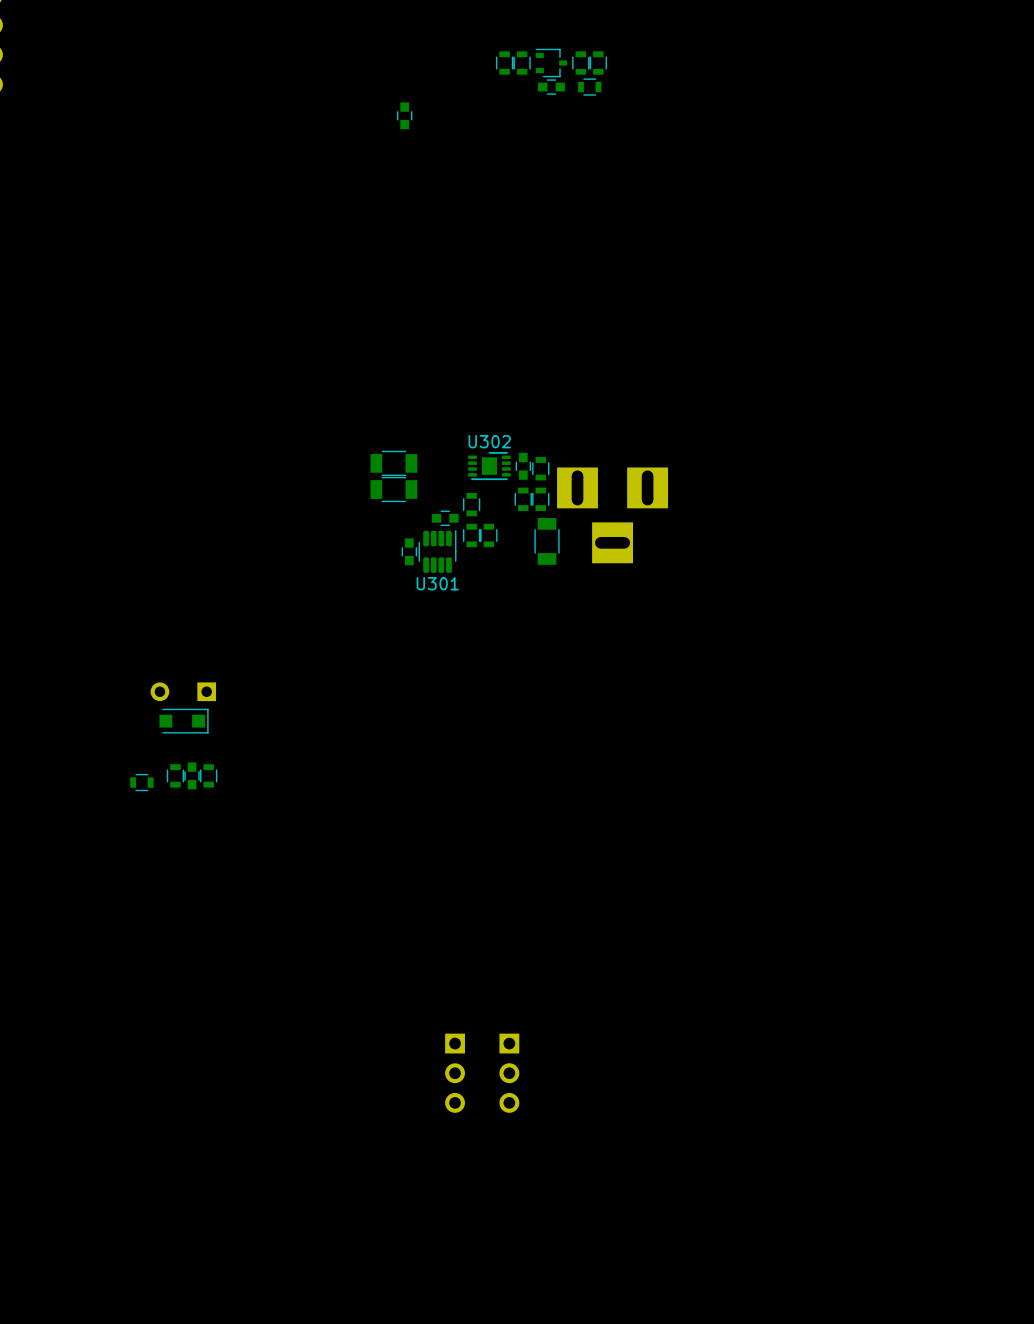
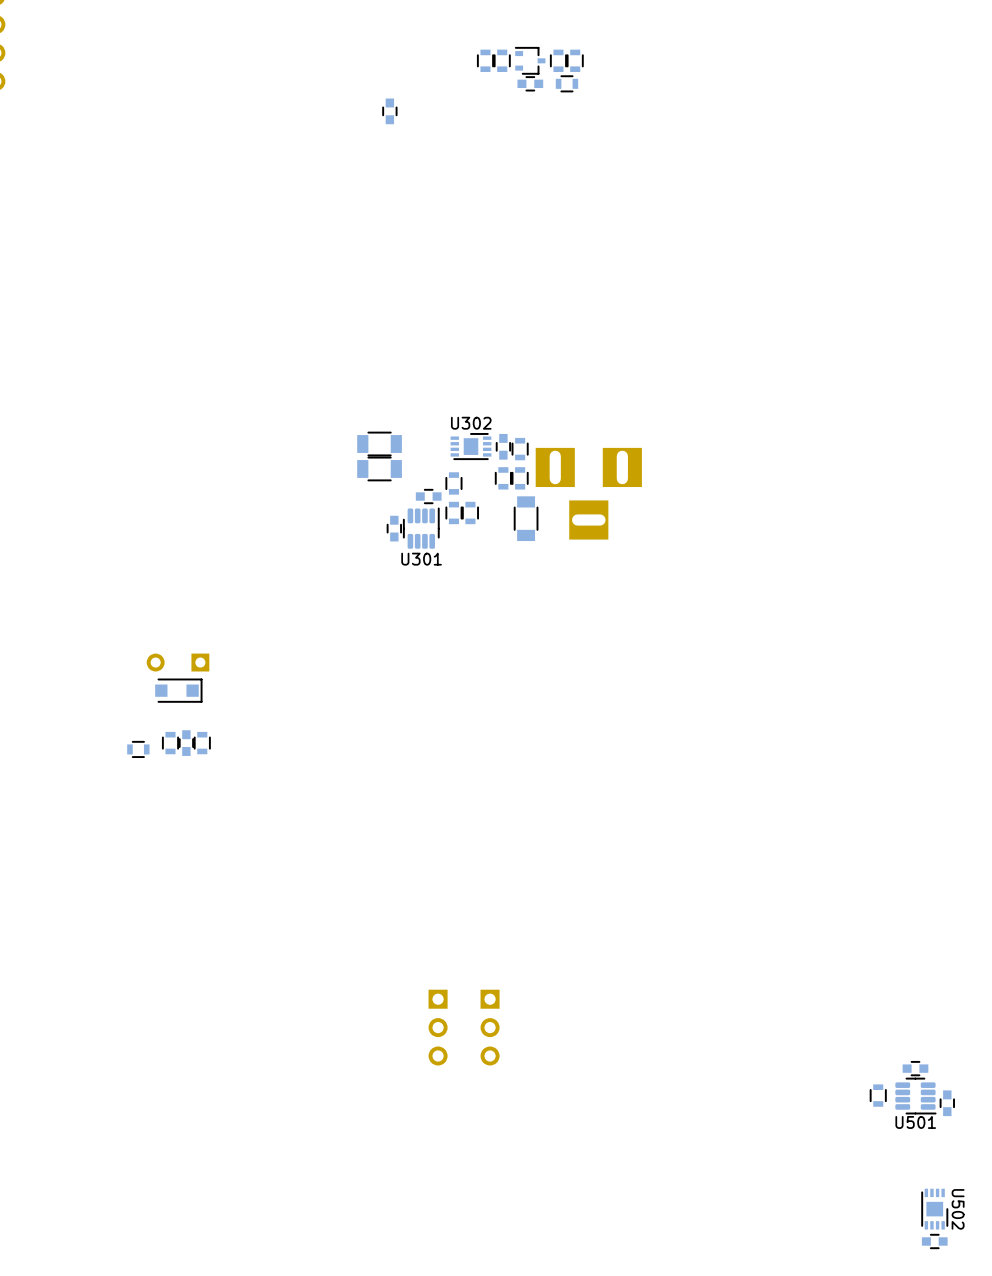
part: none -> (915, 1068)
part: none -> (878, 1095)
U501: none -> (915, 1096)
part: none -> (947, 1103)
U502: none -> (934, 1209)
part: none -> (934, 1241)

